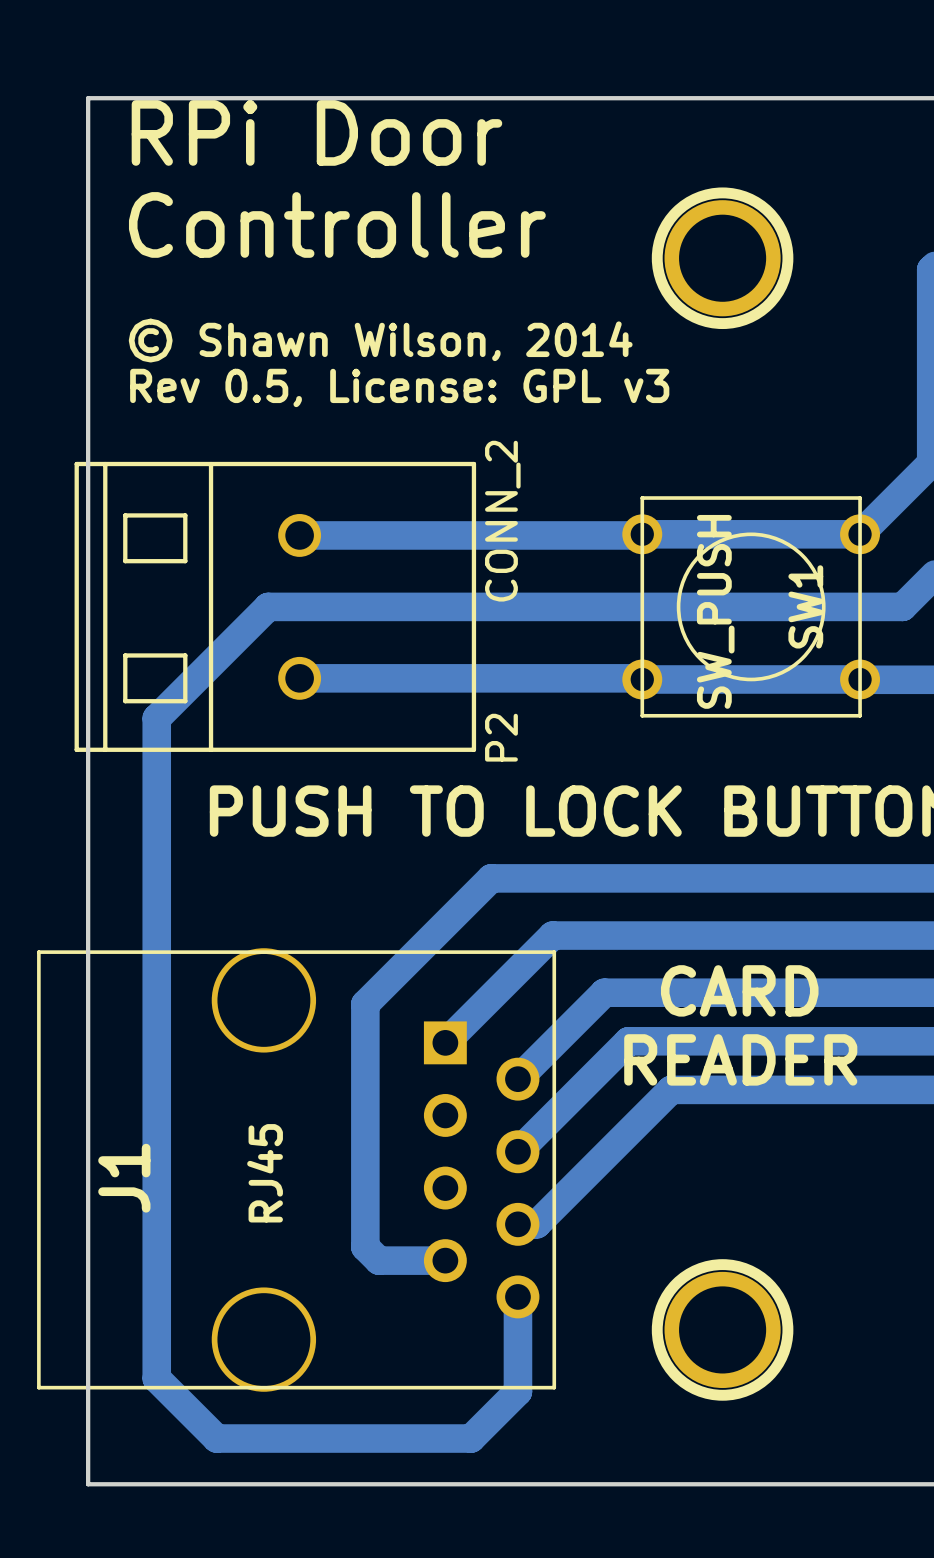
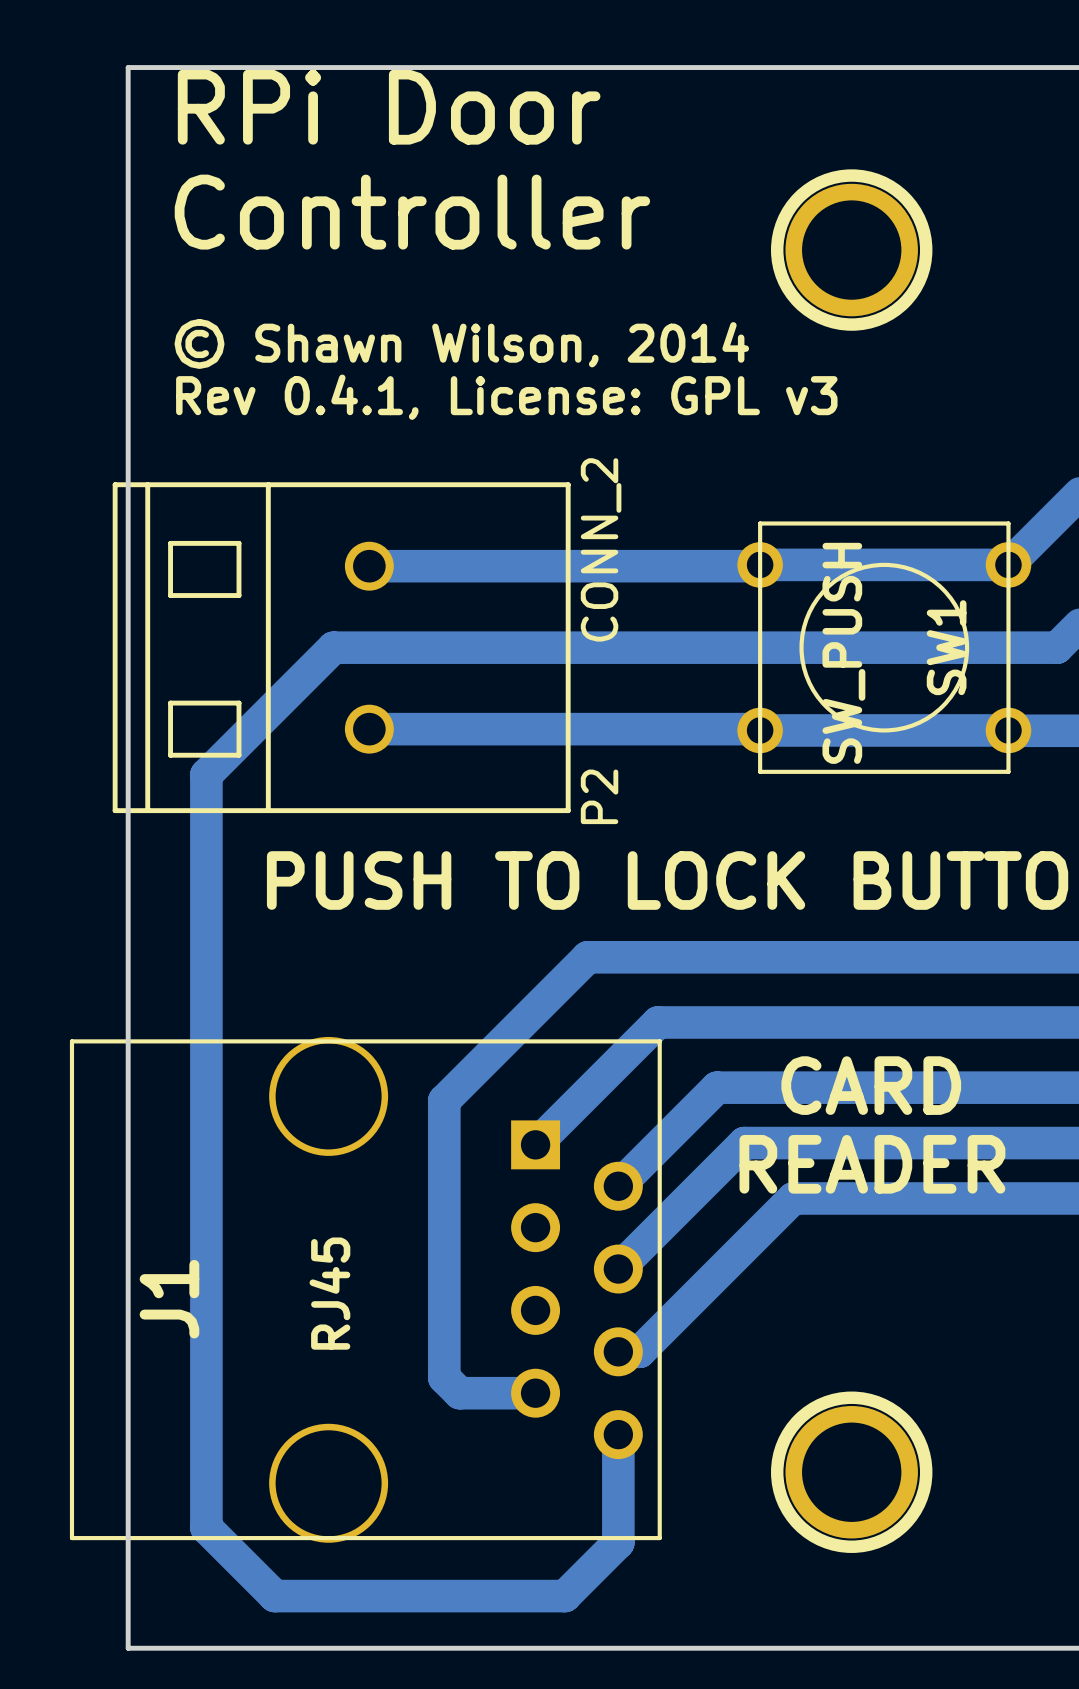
text: Rev 0.5, License: GPL v3 (399, 387) -> Rev 0.4.1, License: GPL v3 (506, 397)

